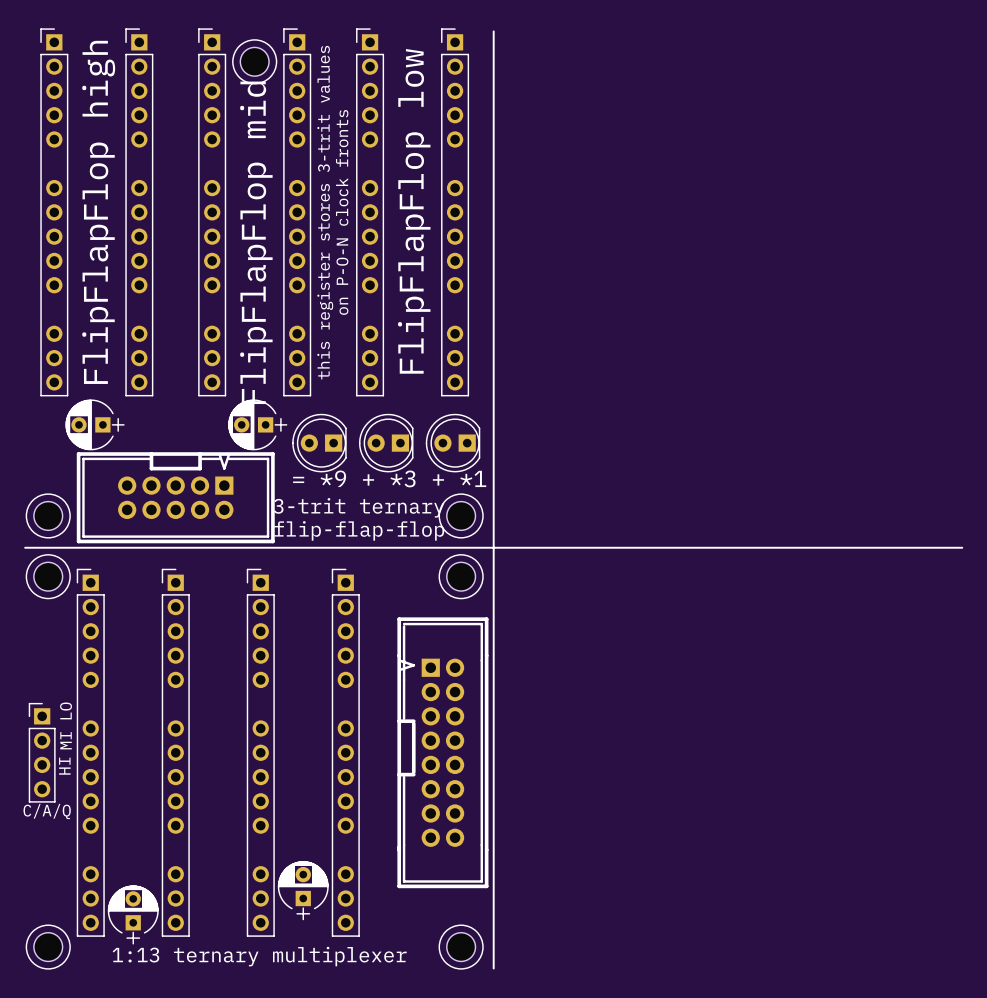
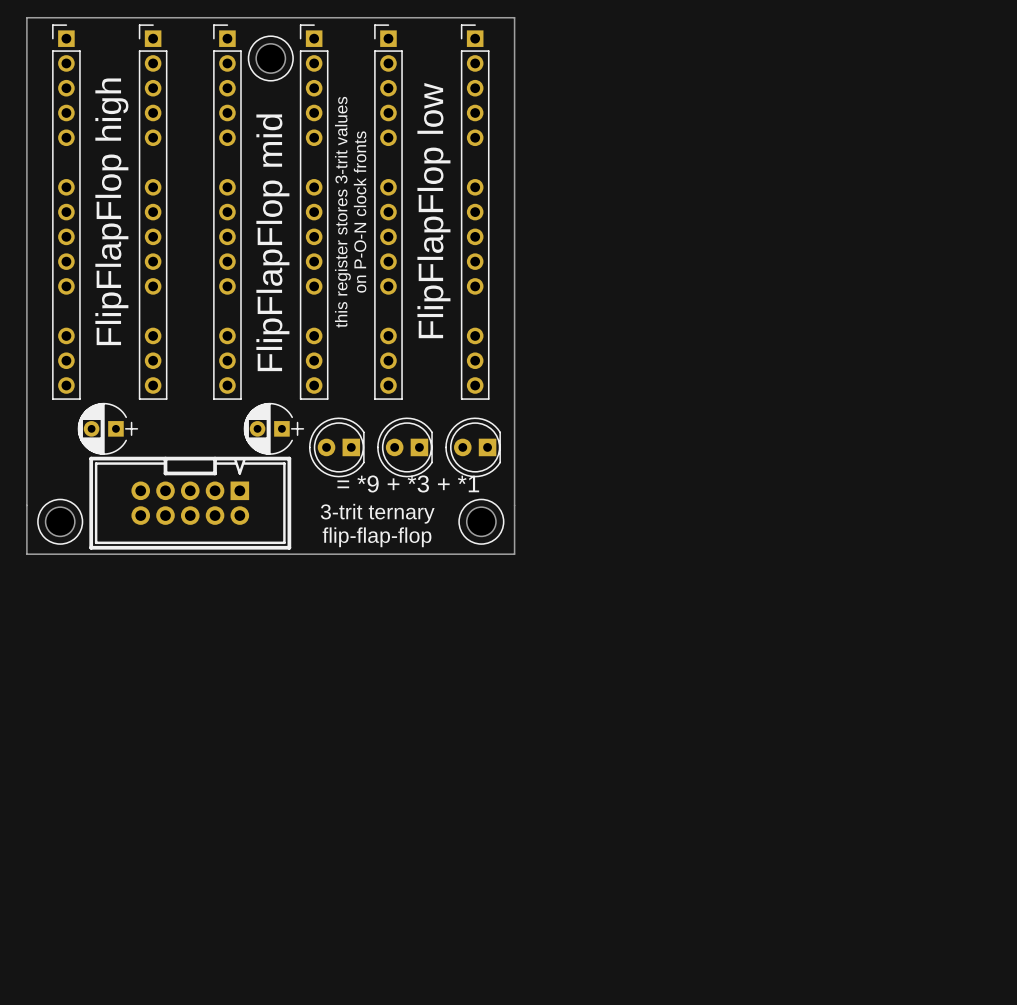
board edge: none -> (26, 17) (26, 554) (514, 554) (514, 17) (26, 17)
line: (493, 31) (493, 968) -> none
line: (25, 547) (962, 547) -> none
part: (48, 576) -> none
part: (461, 576) -> none
text: LO (66, 710) -> none
text: MI (66, 740) -> none
part: (42, 752) -> none
part: (90, 752) -> none
part: (175, 752) -> none
part: (260, 752) -> none
part: (345, 752) -> none
part: (442, 752) -> none
text: HI (64, 766) -> none
text: C/A/Q (47, 811) -> none
part: (303, 890) -> none
part: (133, 914) -> none
part: (48, 947) -> none
part: (461, 947) -> none
text: 1:13 ternary multiplexer (259, 956) -> none

